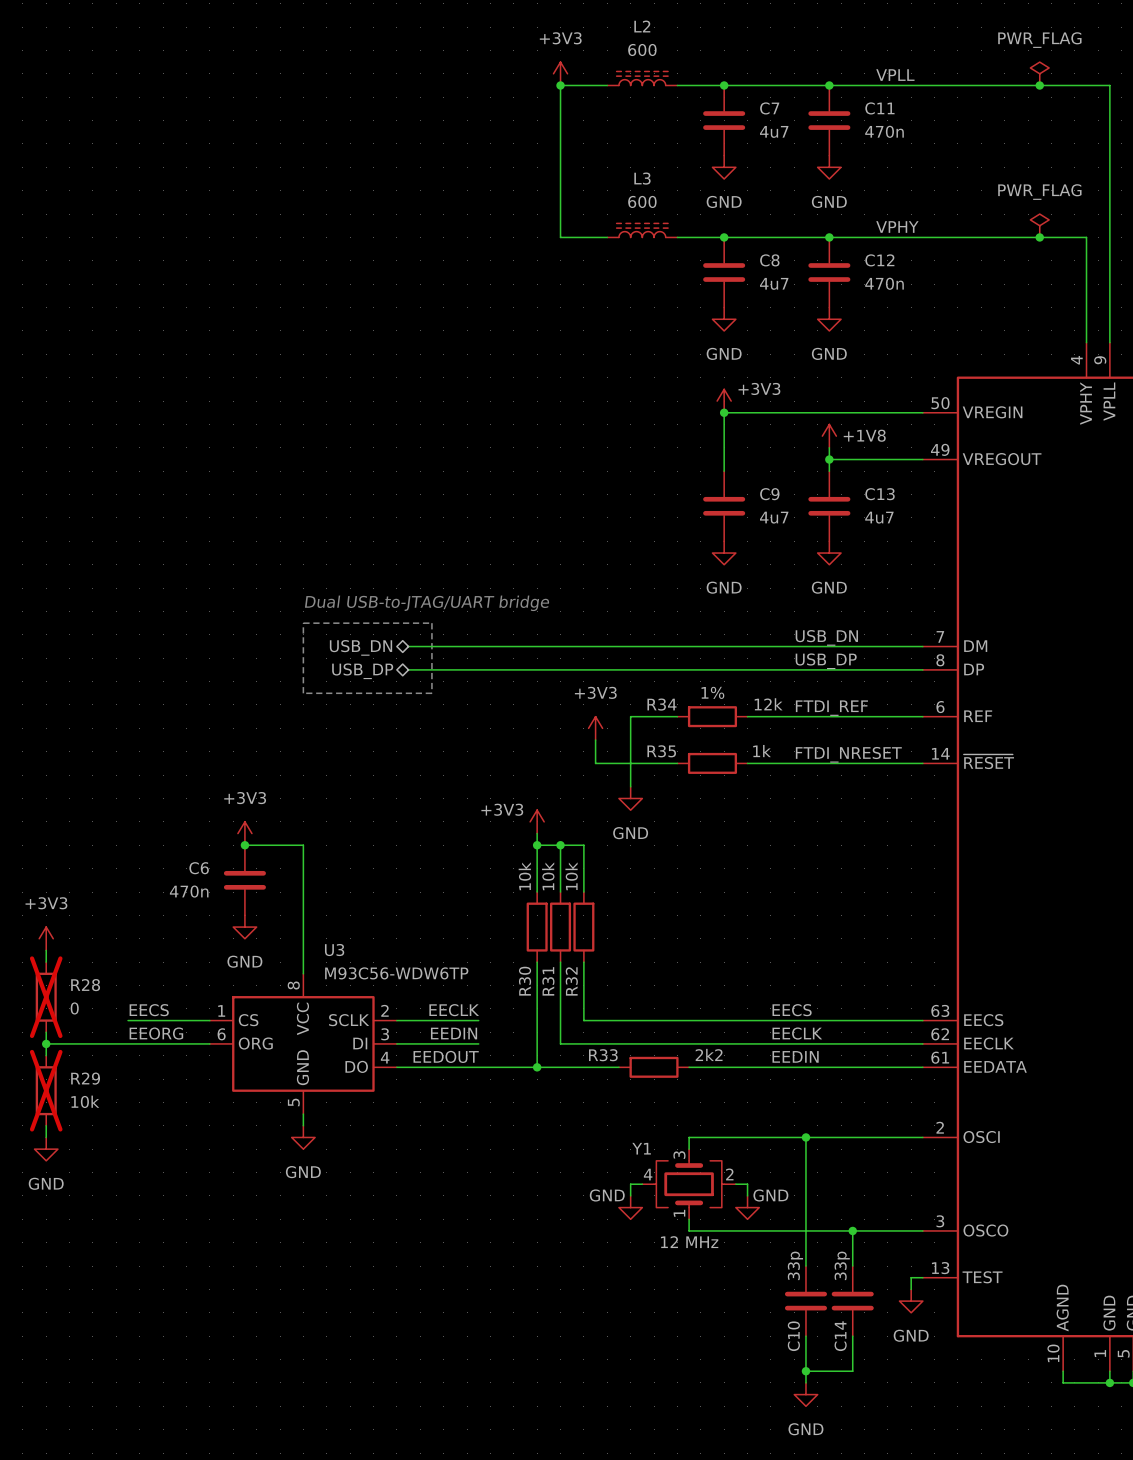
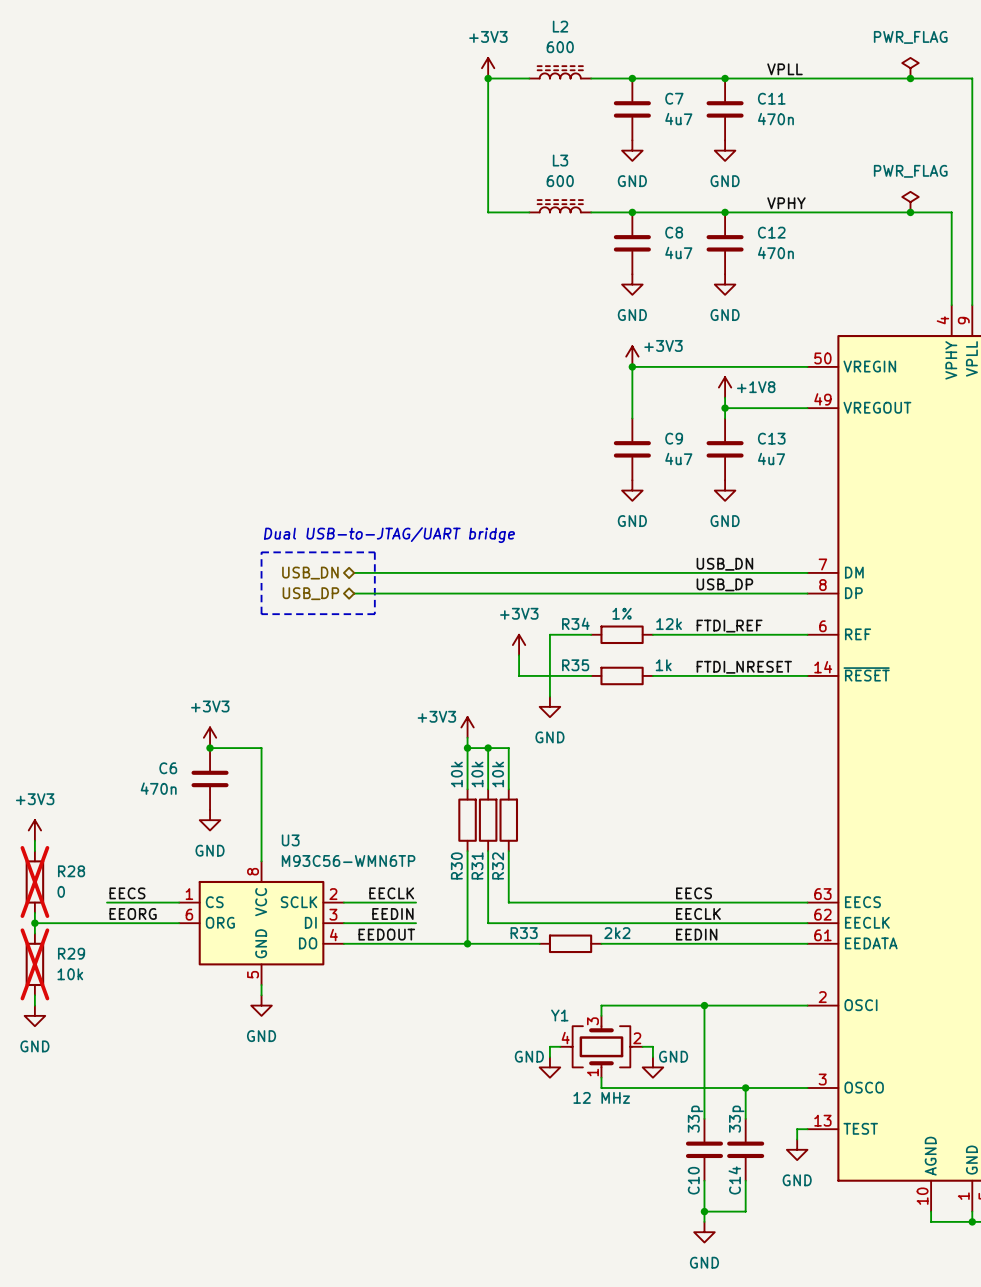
U3 value: M93C56-WDW6TP (396, 973) -> M93C56-WMN6TP (348, 860)

